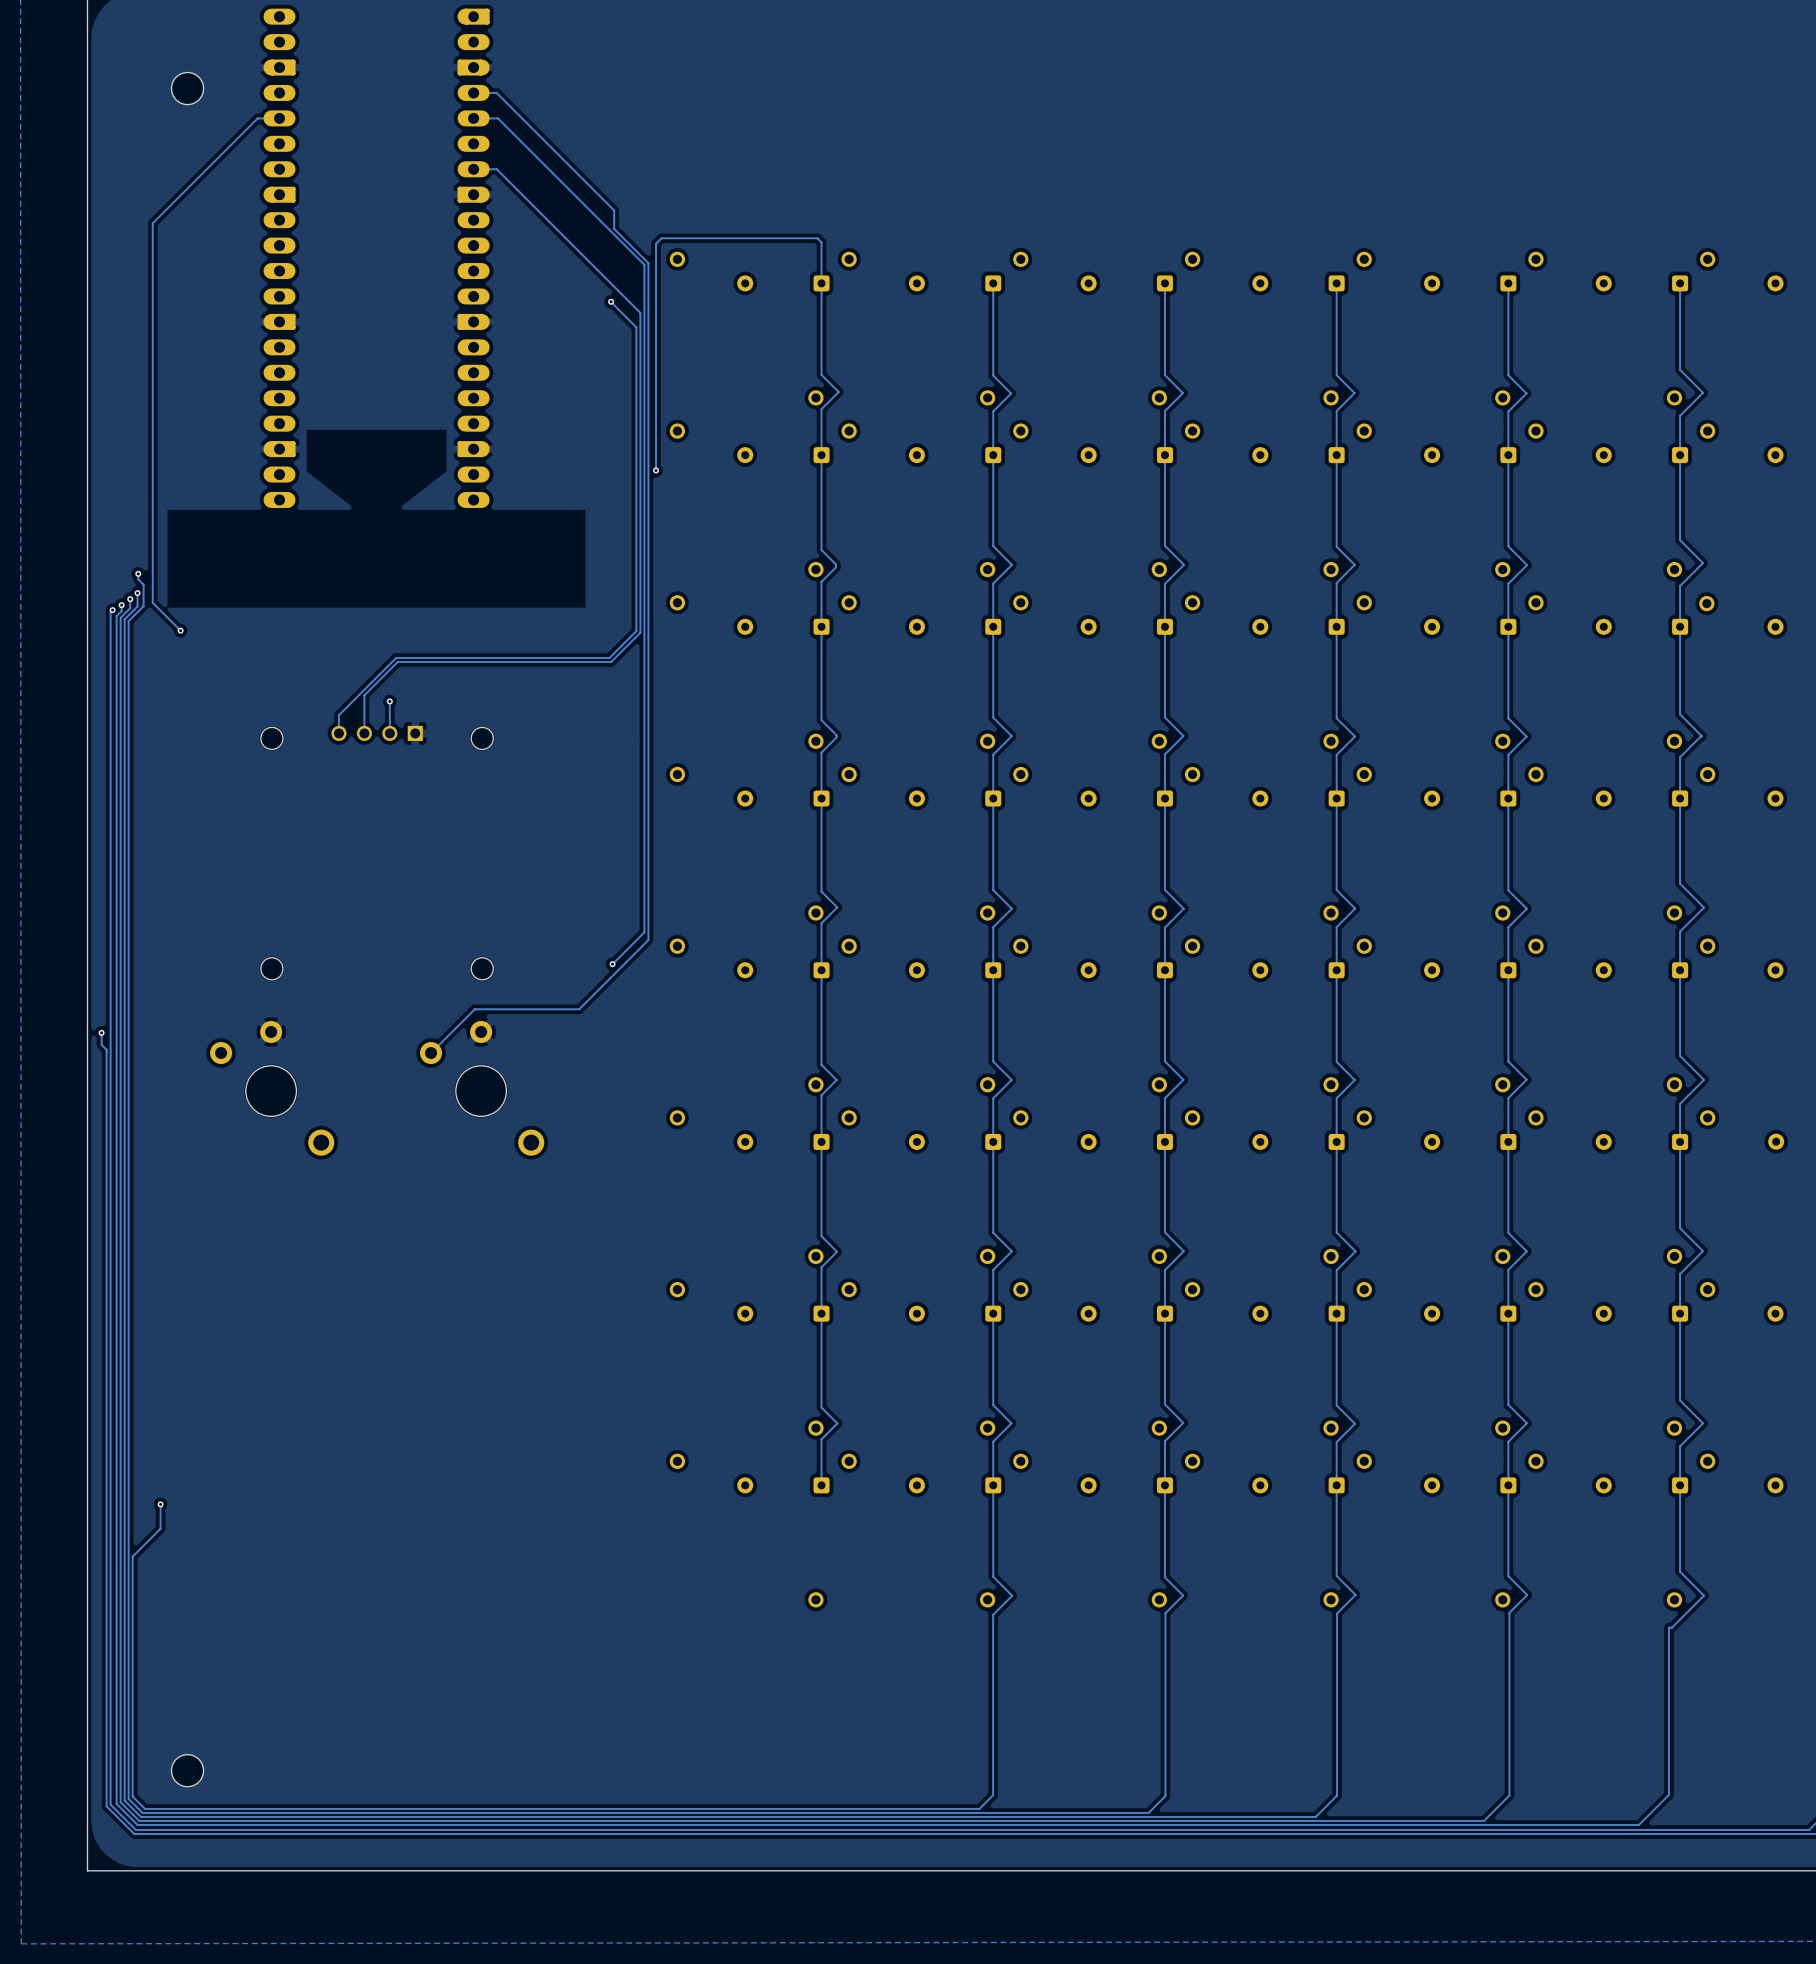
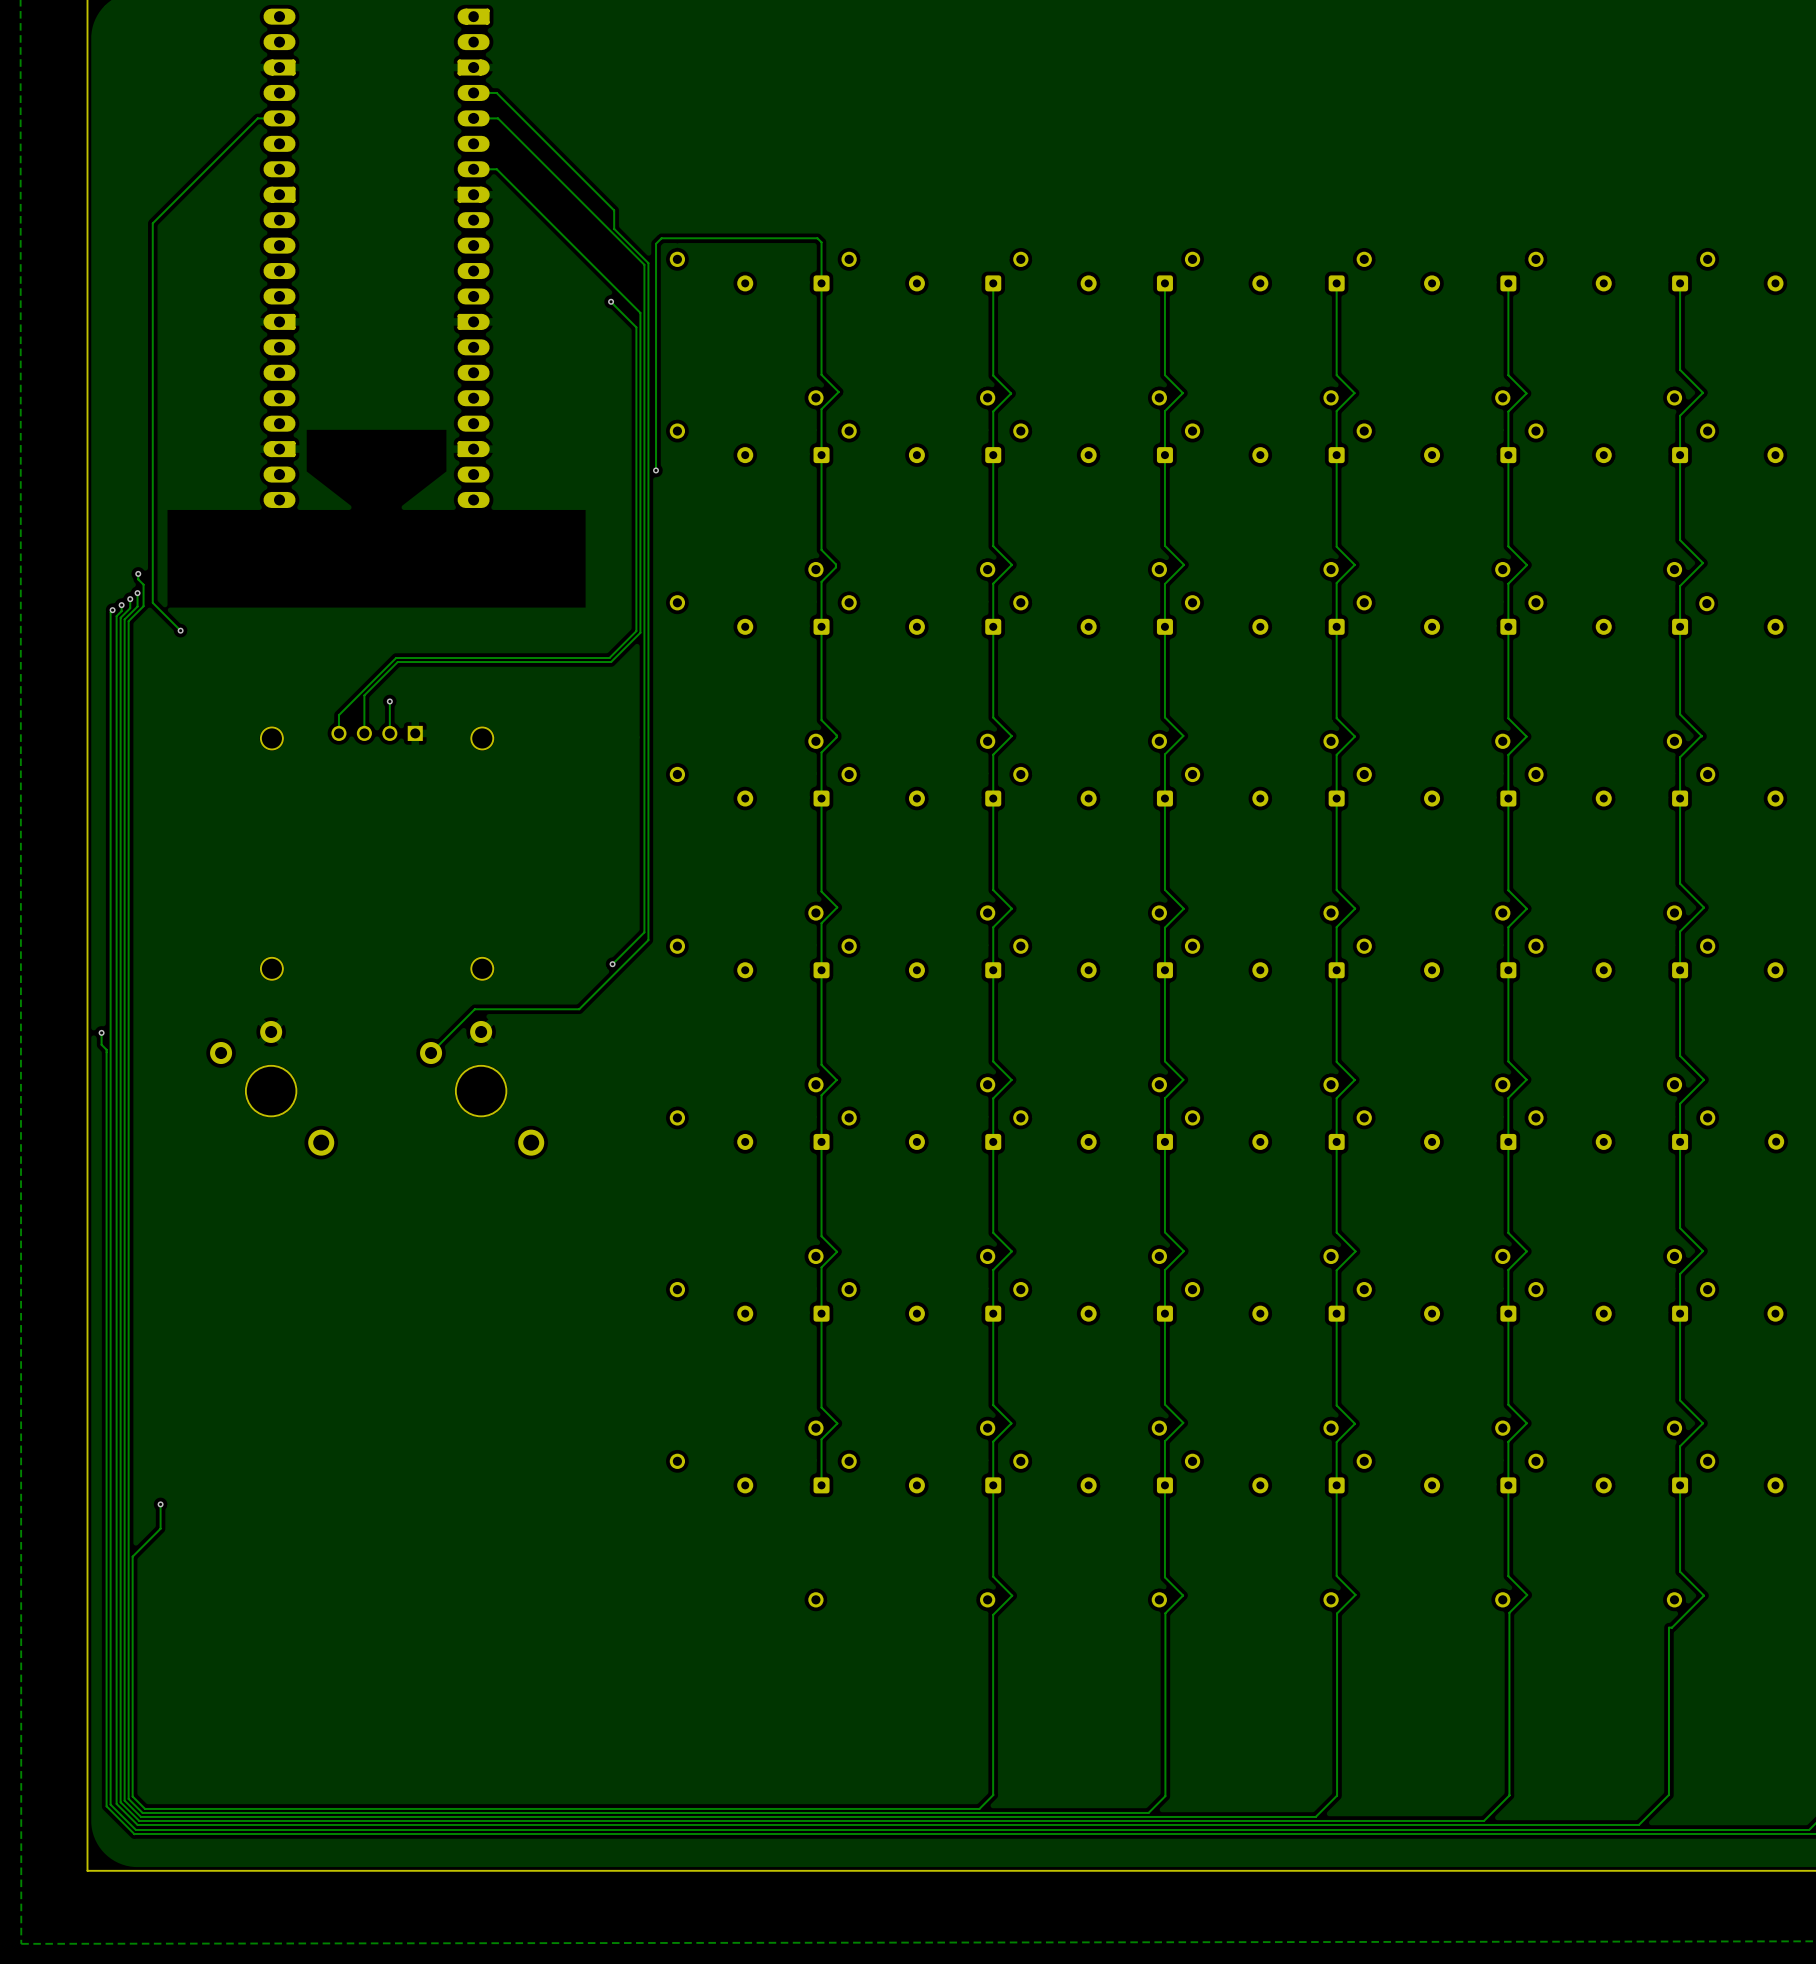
part: (187, 88) -> none
part: (187, 1770) -> none

